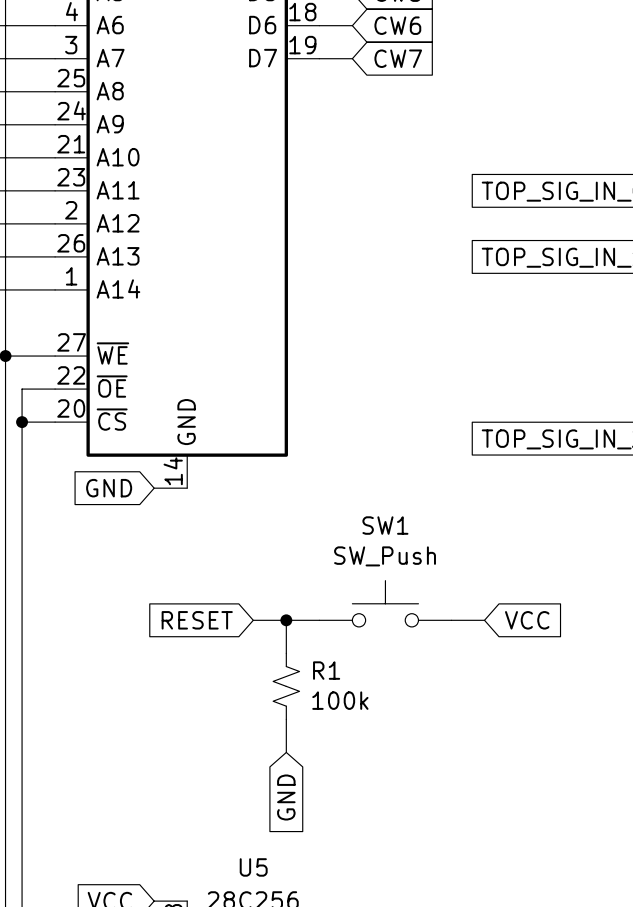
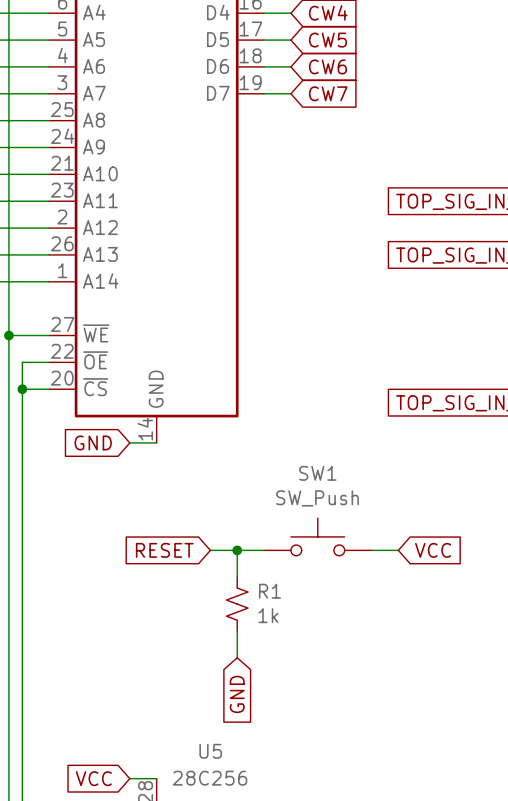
R1 value: 100k (340, 700) -> 1k (268, 615)

